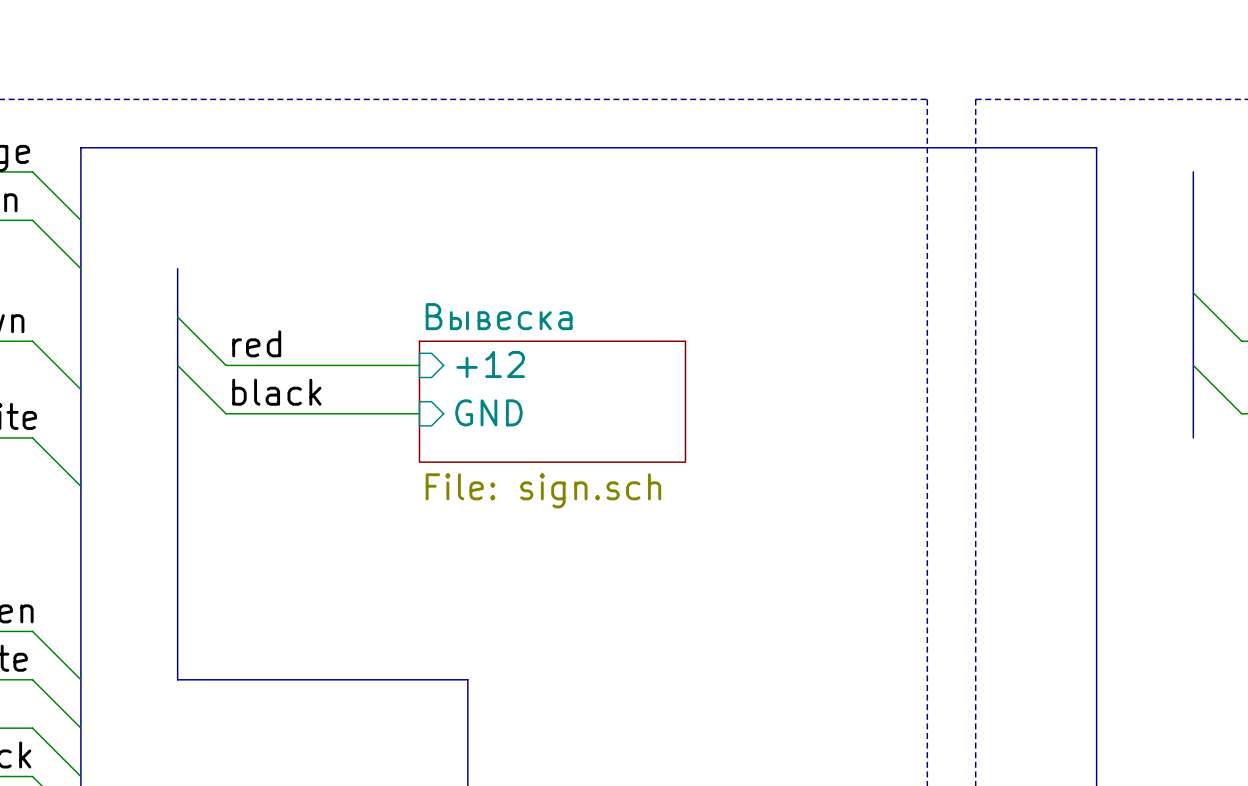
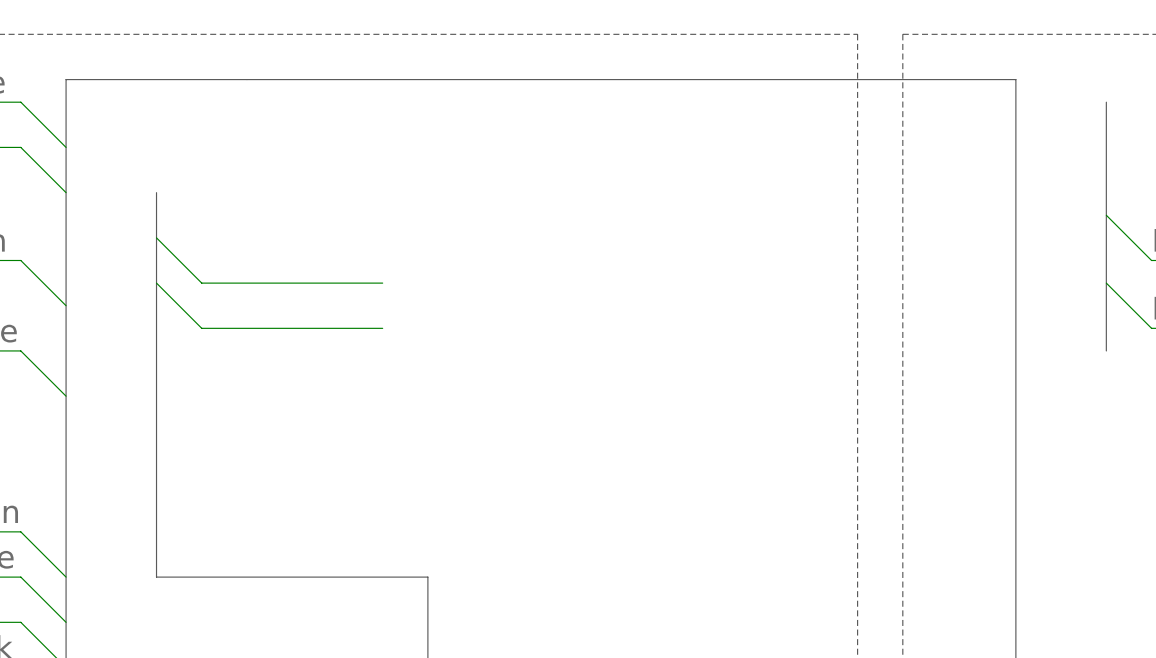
label: red (256, 343) -> none
sheet pin: +12 (490, 364) -> none
label: black (276, 392) -> none
sheet Вывеска: File: sign.sch (552, 401) -> none
sheet pin: GND (488, 412) -> none

